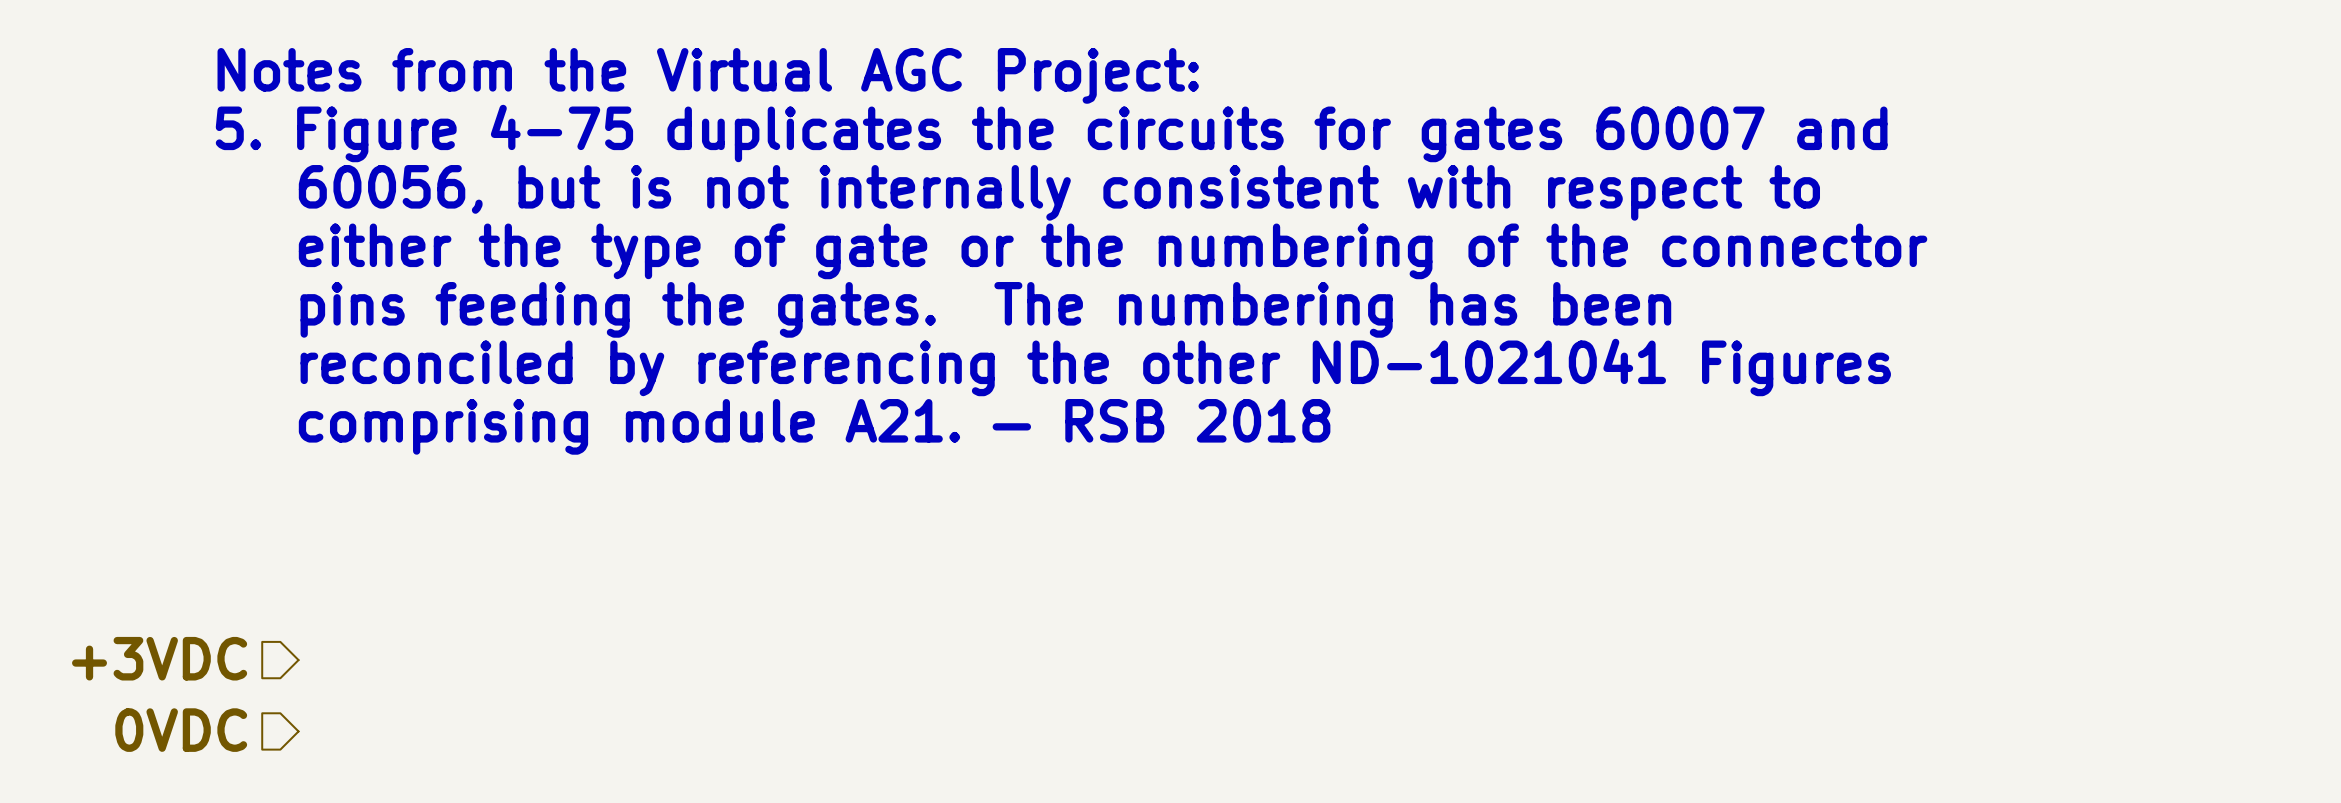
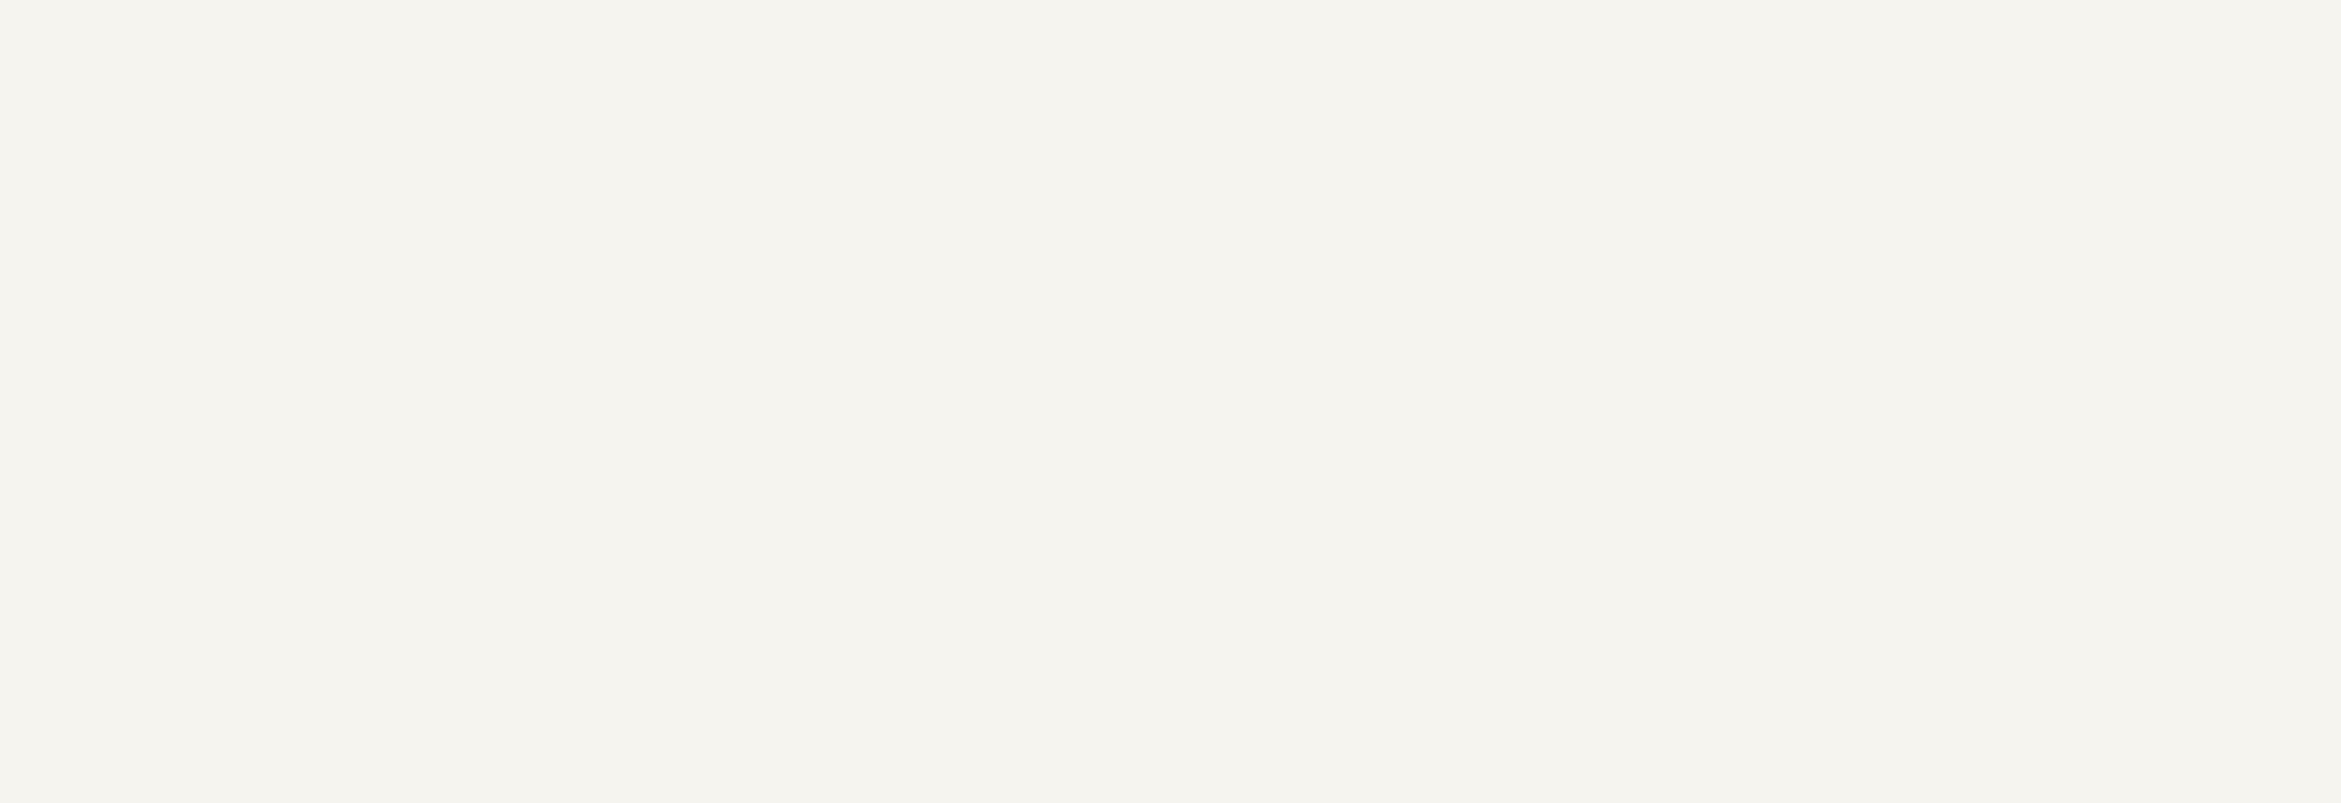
text: Notes from the Virtual AGC Project: (708, 75) -> none
text: 5. Figure 4-75 duplicates the circuits for gates 60007 and (1051, 133) -> none
text: 60056, but is not internally consistent with respect to (1059, 192) -> none
text: either the type of gate or the numbering of the connector (1113, 251) -> none
text: pins feeding the gates. The numbering has been (985, 309) -> none
text: reconciled by referencing the other ND-1021041 Figures (1095, 367) -> none
text: comprising module A21. — RSB 2018 (814, 426) -> none
hierarchical label: +3VDC (159, 658) -> none
hierarchical label: 0VDC (181, 730) -> none

